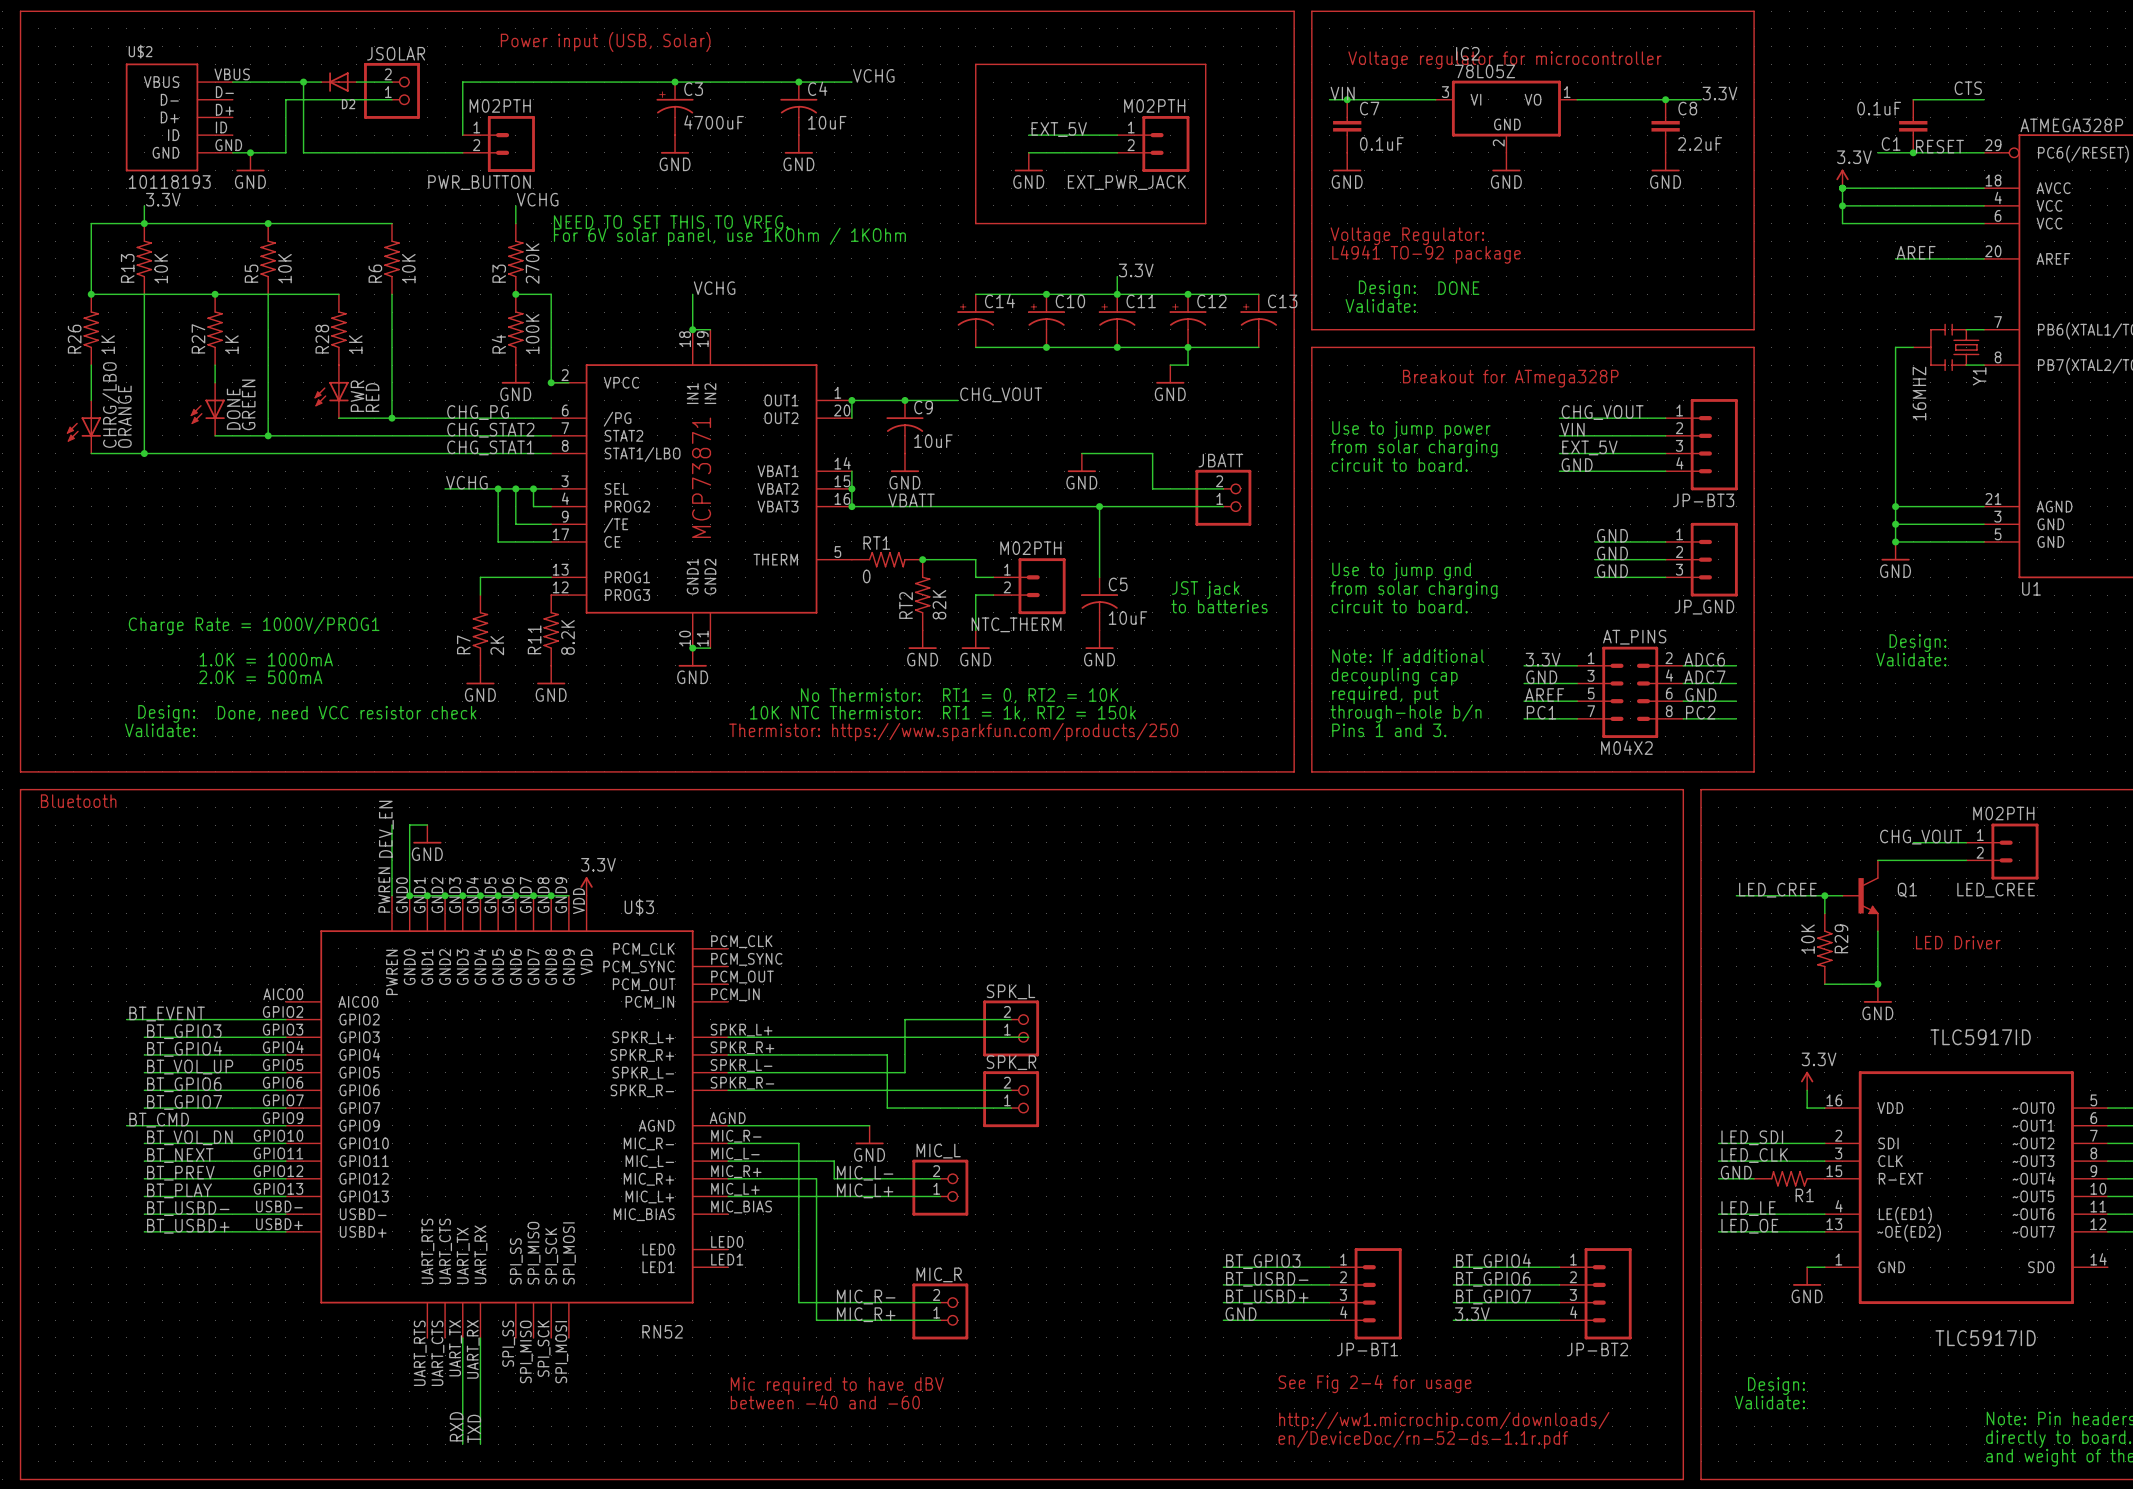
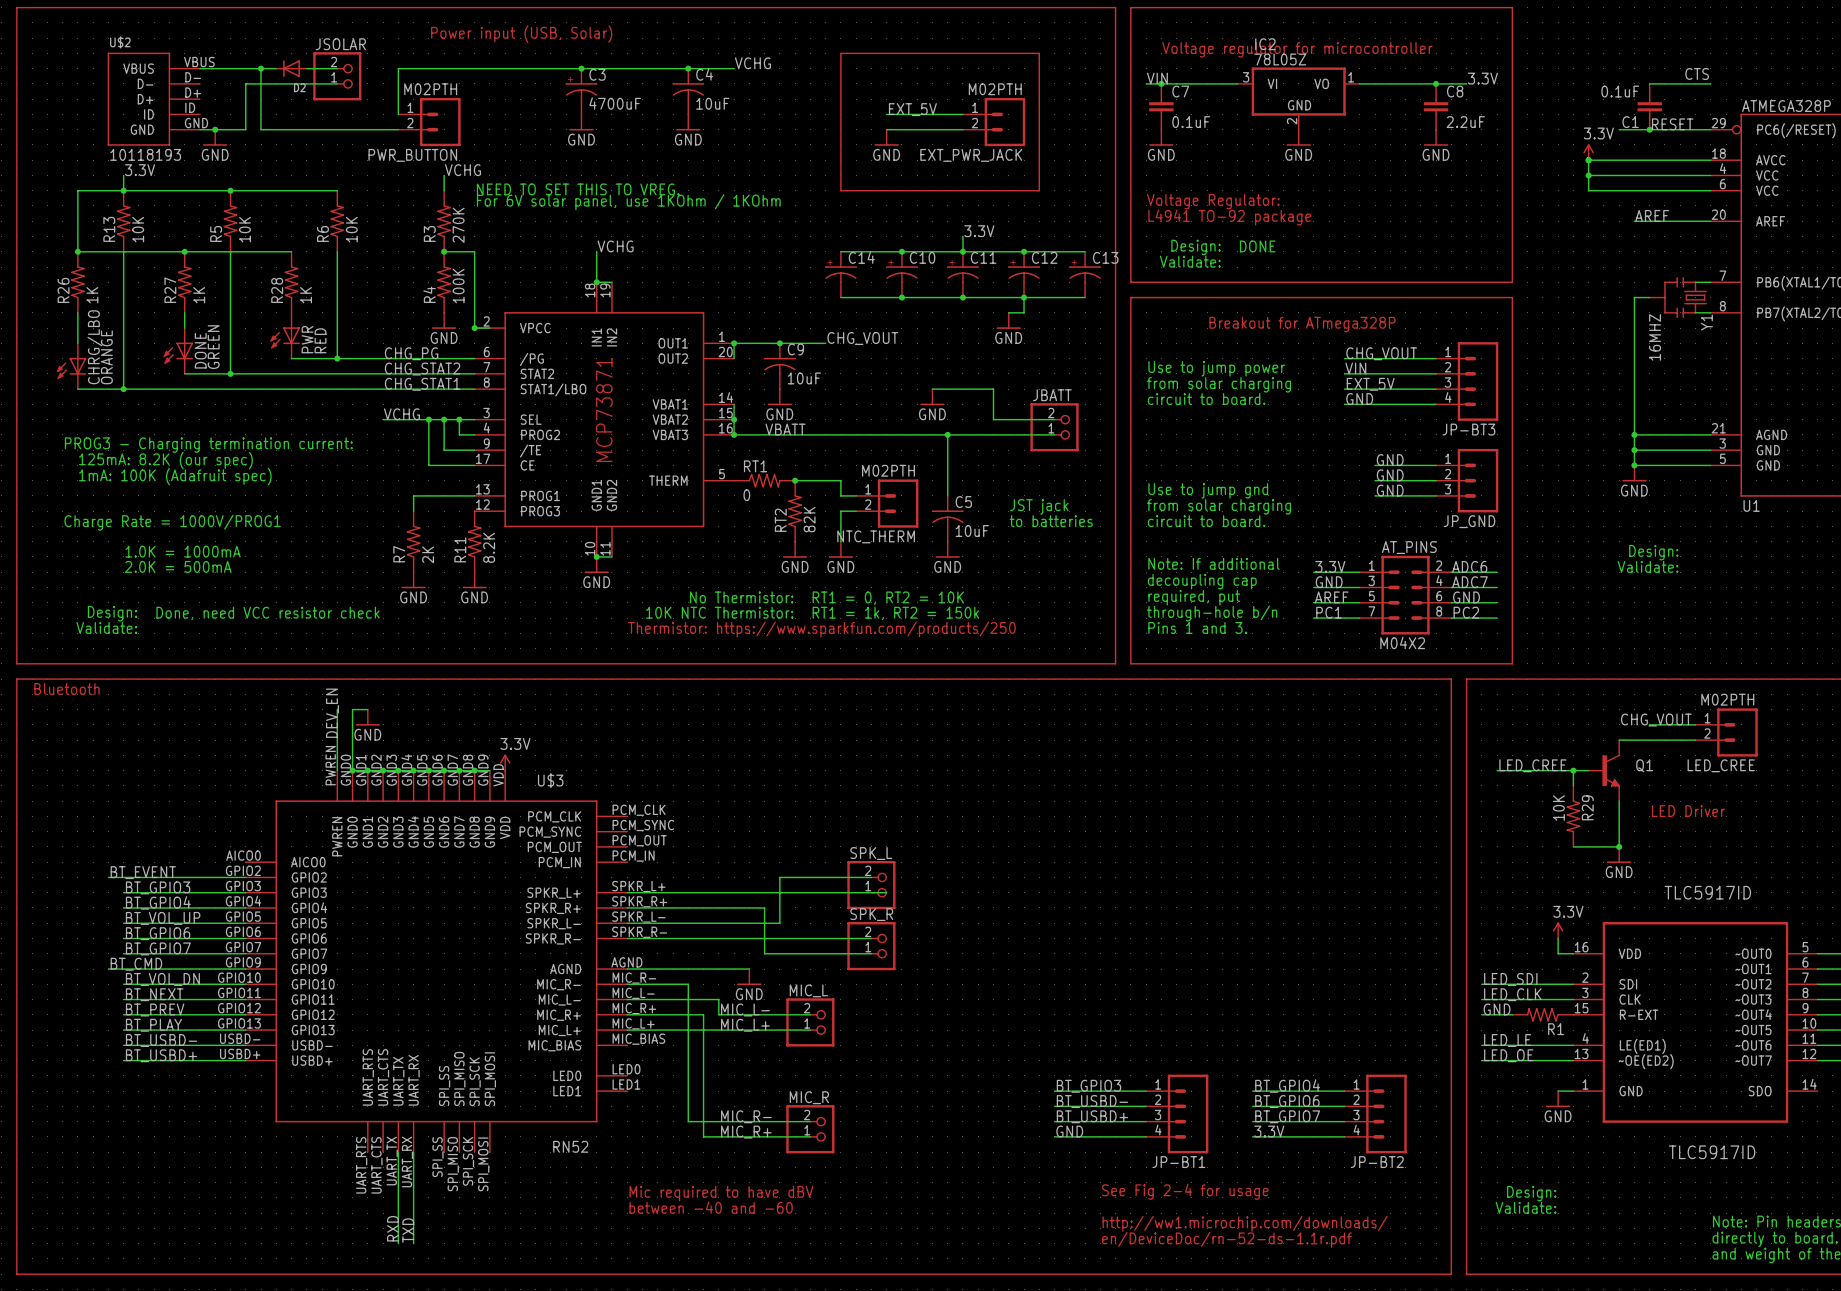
text: none -> PROG3 - Charging termination current: (208, 445)
text: none -> 125mA: 8.2K (our spec) (165, 460)
text: none -> 1mA: 100K (Adafruit spec) (175, 476)
text position: Charge Rate = 1000V/PROG1 (254, 626) -> Charge Rate = 1000V/PROG1 (172, 522)
text position: 1.0K = 1000mA (266, 659) -> 1.0K = 1000mA (183, 551)
text position: 2.0K = 500mA (260, 677) -> 2.0K = 500mA (178, 566)
text position: Design: (166, 713) -> Design: (112, 613)
text position: Done, need VCC resistor check (347, 713) -> Done, need VCC resistor check (268, 613)
text position: Validate: (160, 730) -> Validate: (106, 627)

